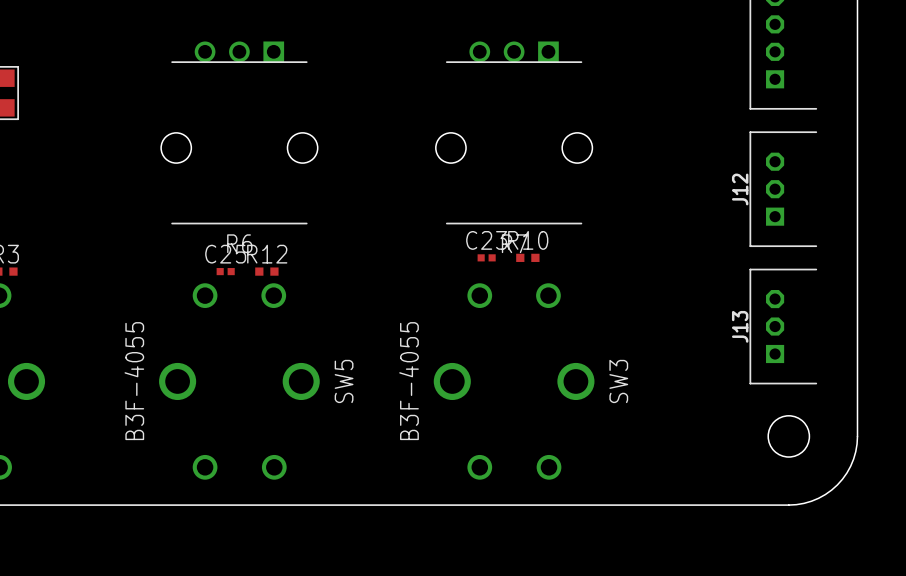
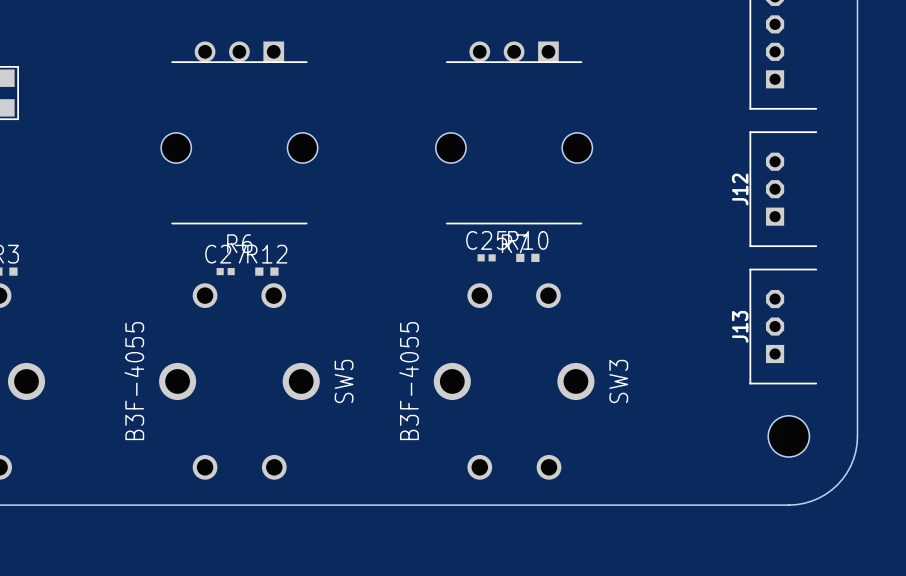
C23 name: C23 (486, 240) -> C25 (486, 240)
C25 name: C25 (225, 254) -> C27 (226, 254)

